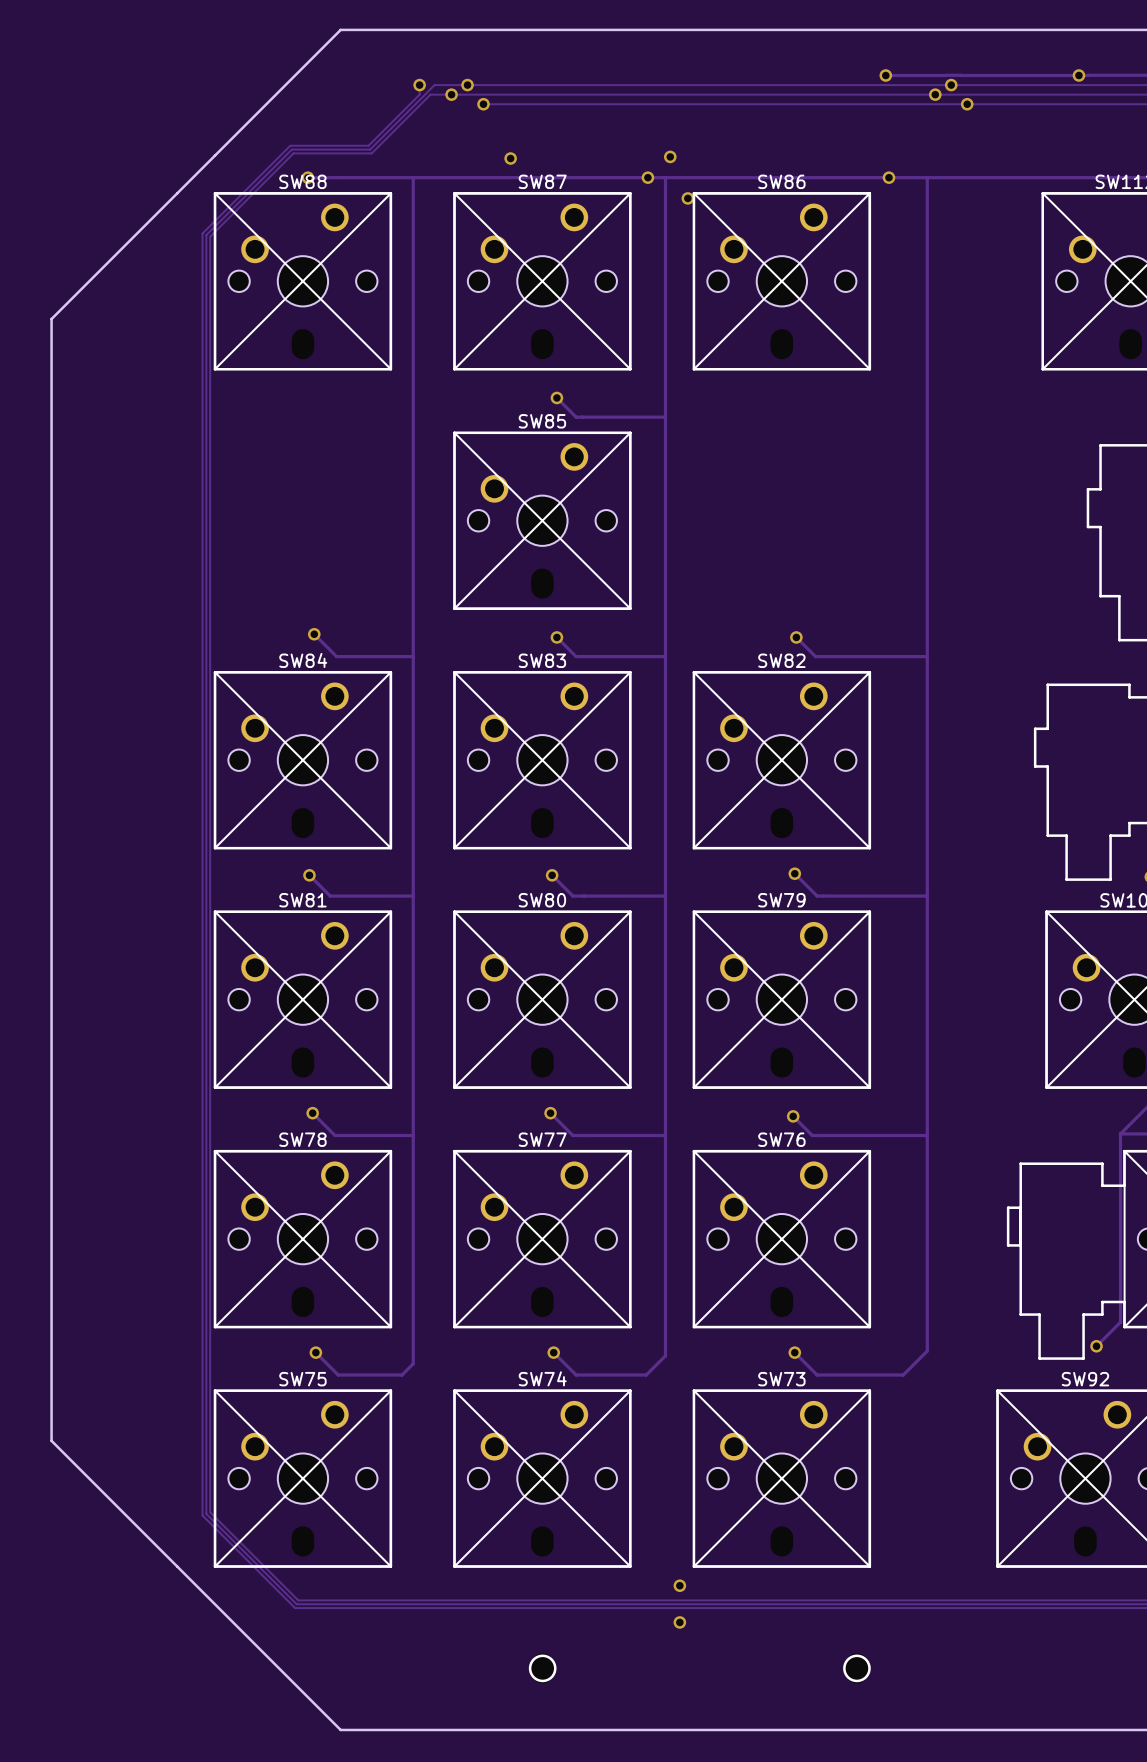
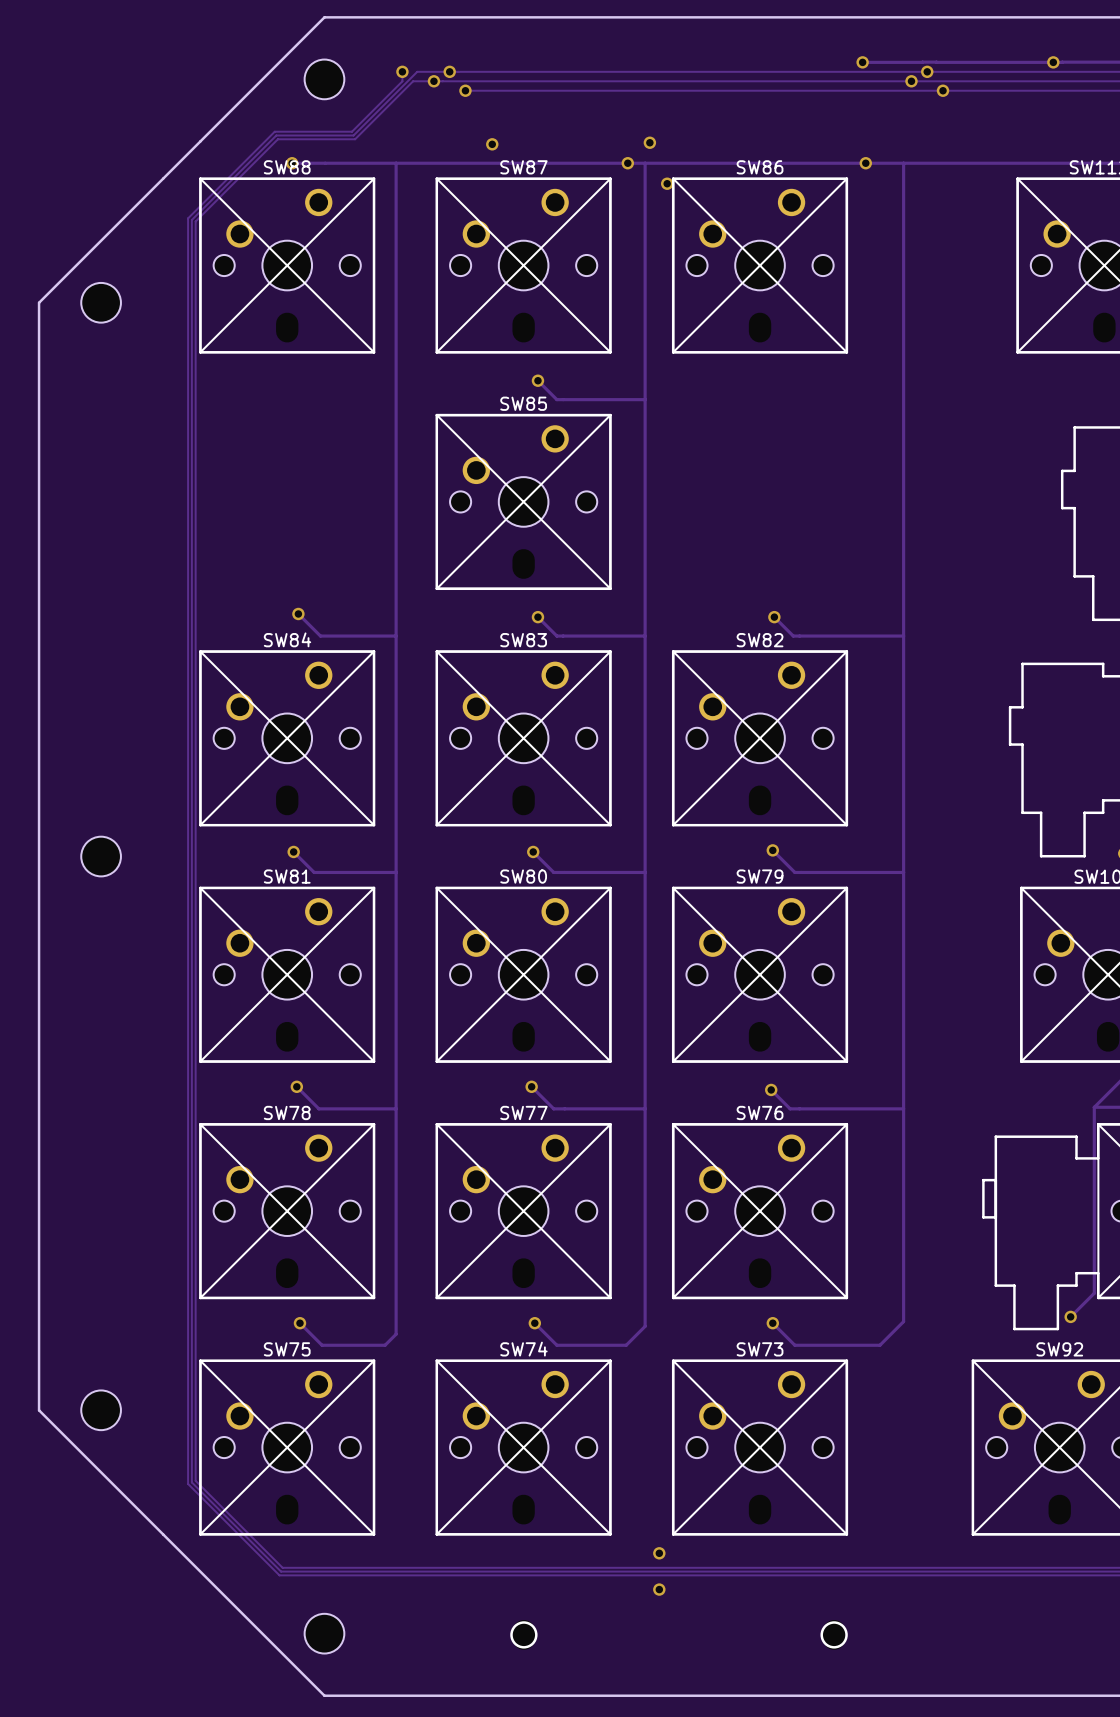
part: none -> (324, 79)
part: none -> (101, 302)
part: none -> (101, 856)
part: none -> (101, 1410)
part: none -> (324, 1633)

